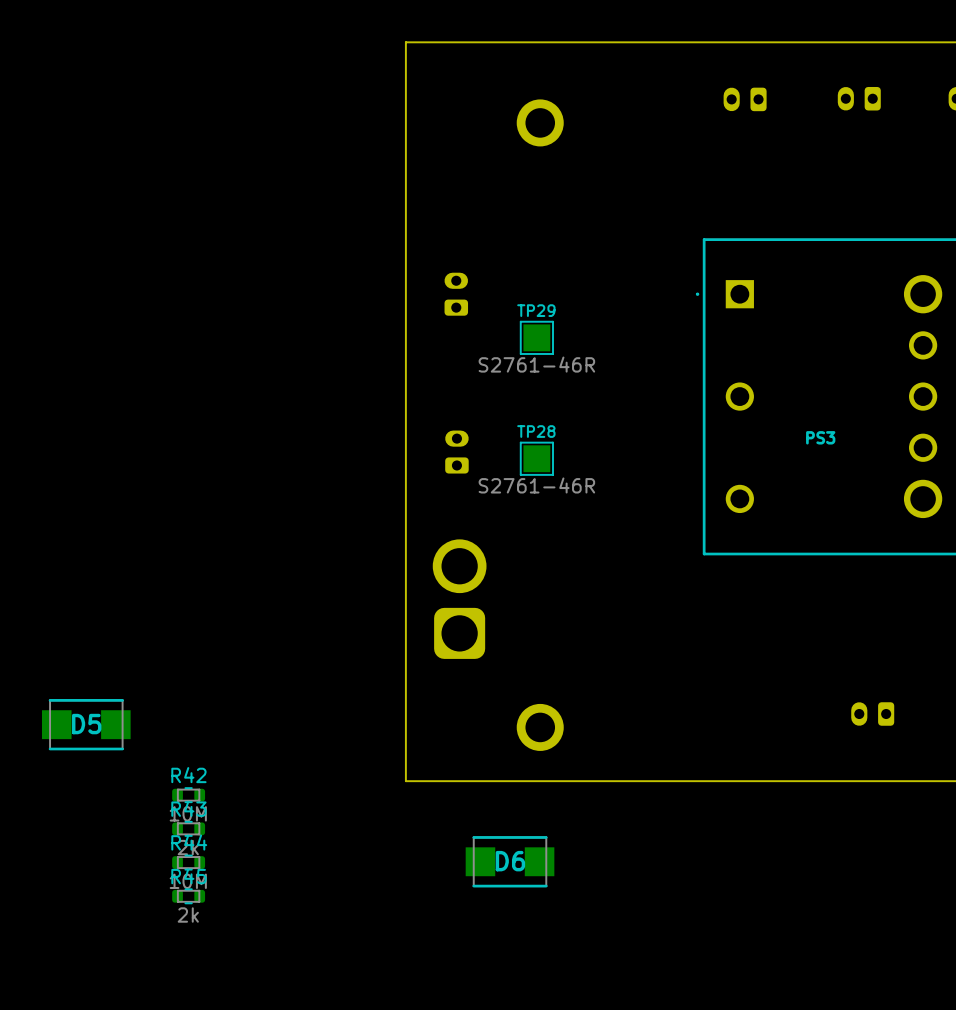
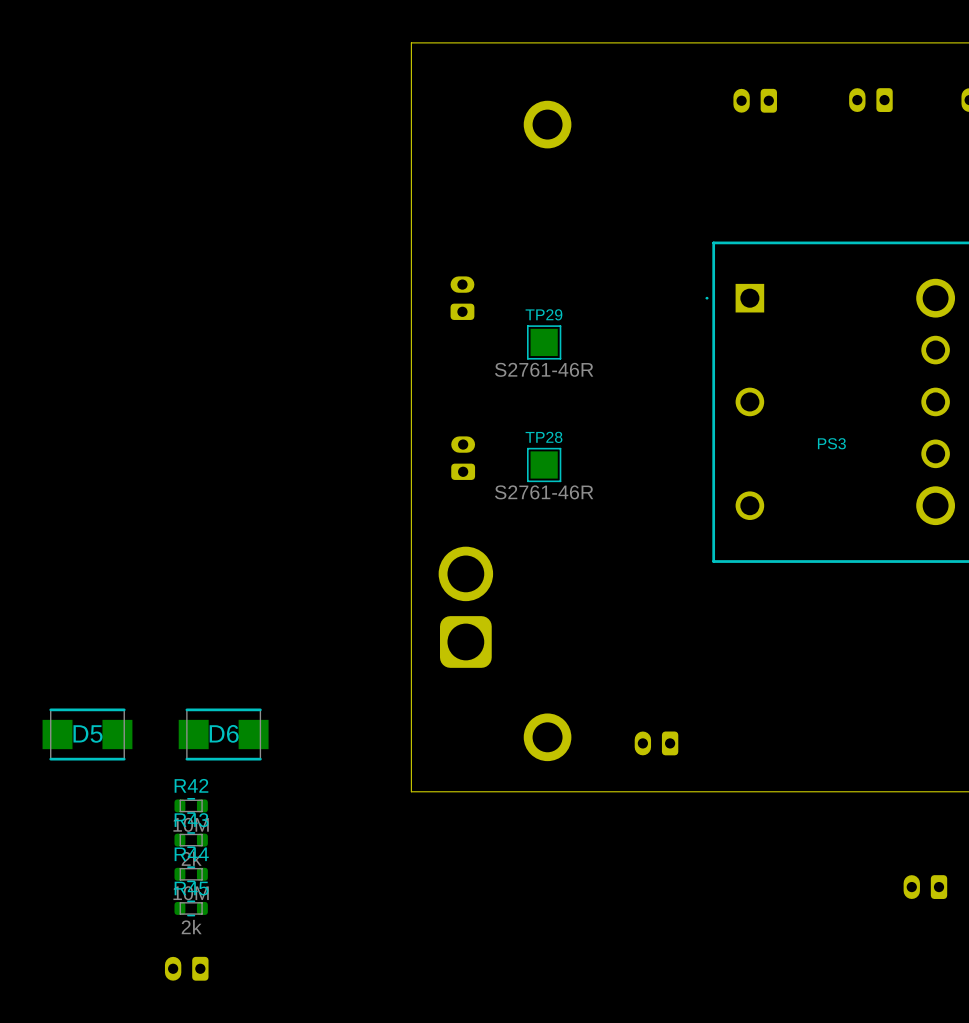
part: (872, 714) -> none
part: none -> (656, 743)
D6 position: (510, 861) -> (223, 734)
part: none -> (925, 887)
part: none -> (186, 968)

